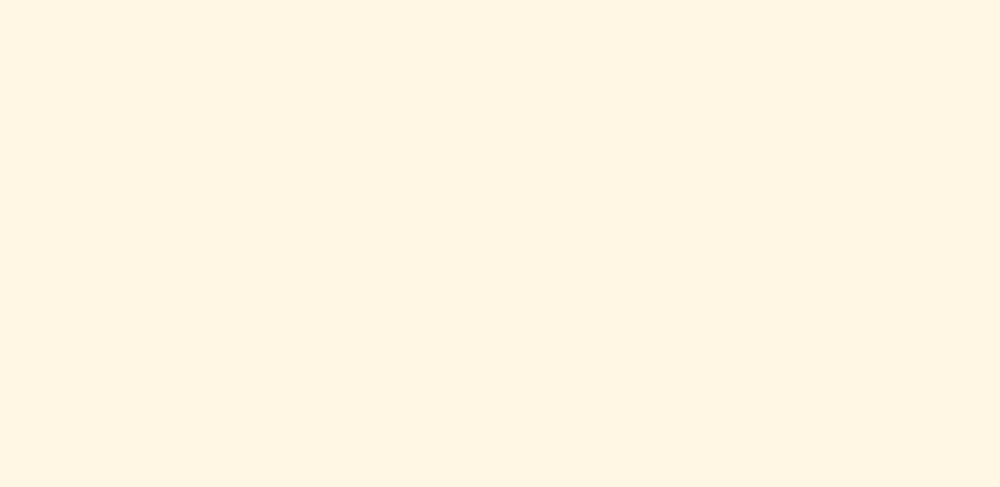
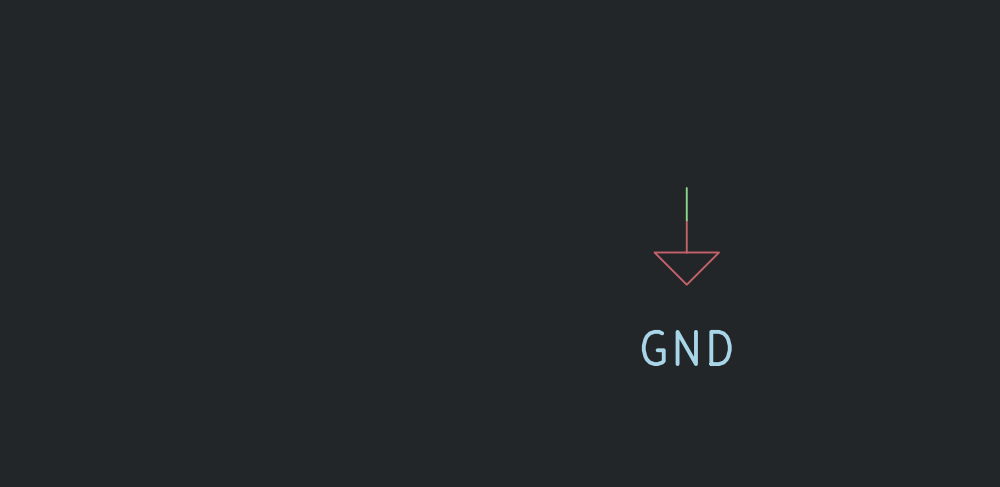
wire: none -> (686, 188) (686, 220)
power symbol: none -> GND (686, 252)

